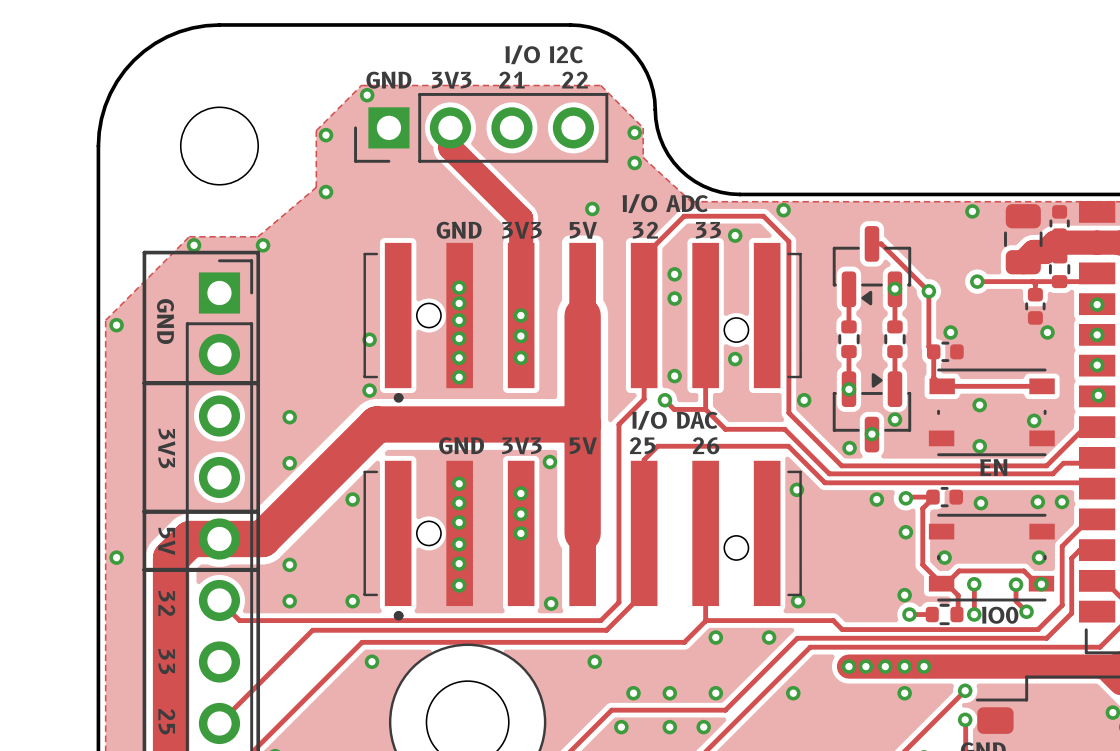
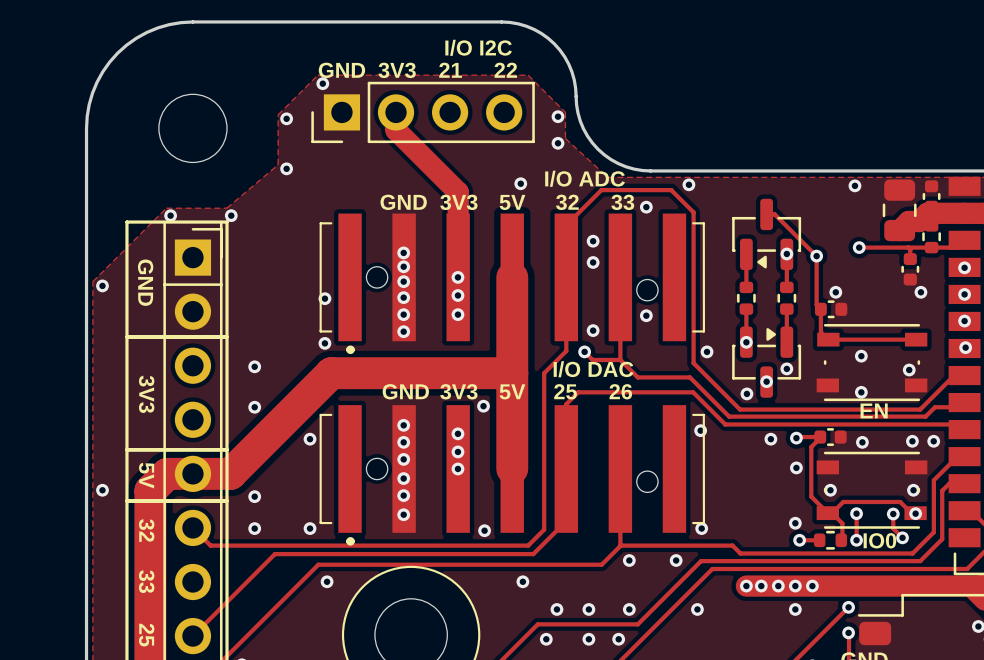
line: none -> (164, 222) (164, 284)
line: none -> (221, 222) (221, 284)

